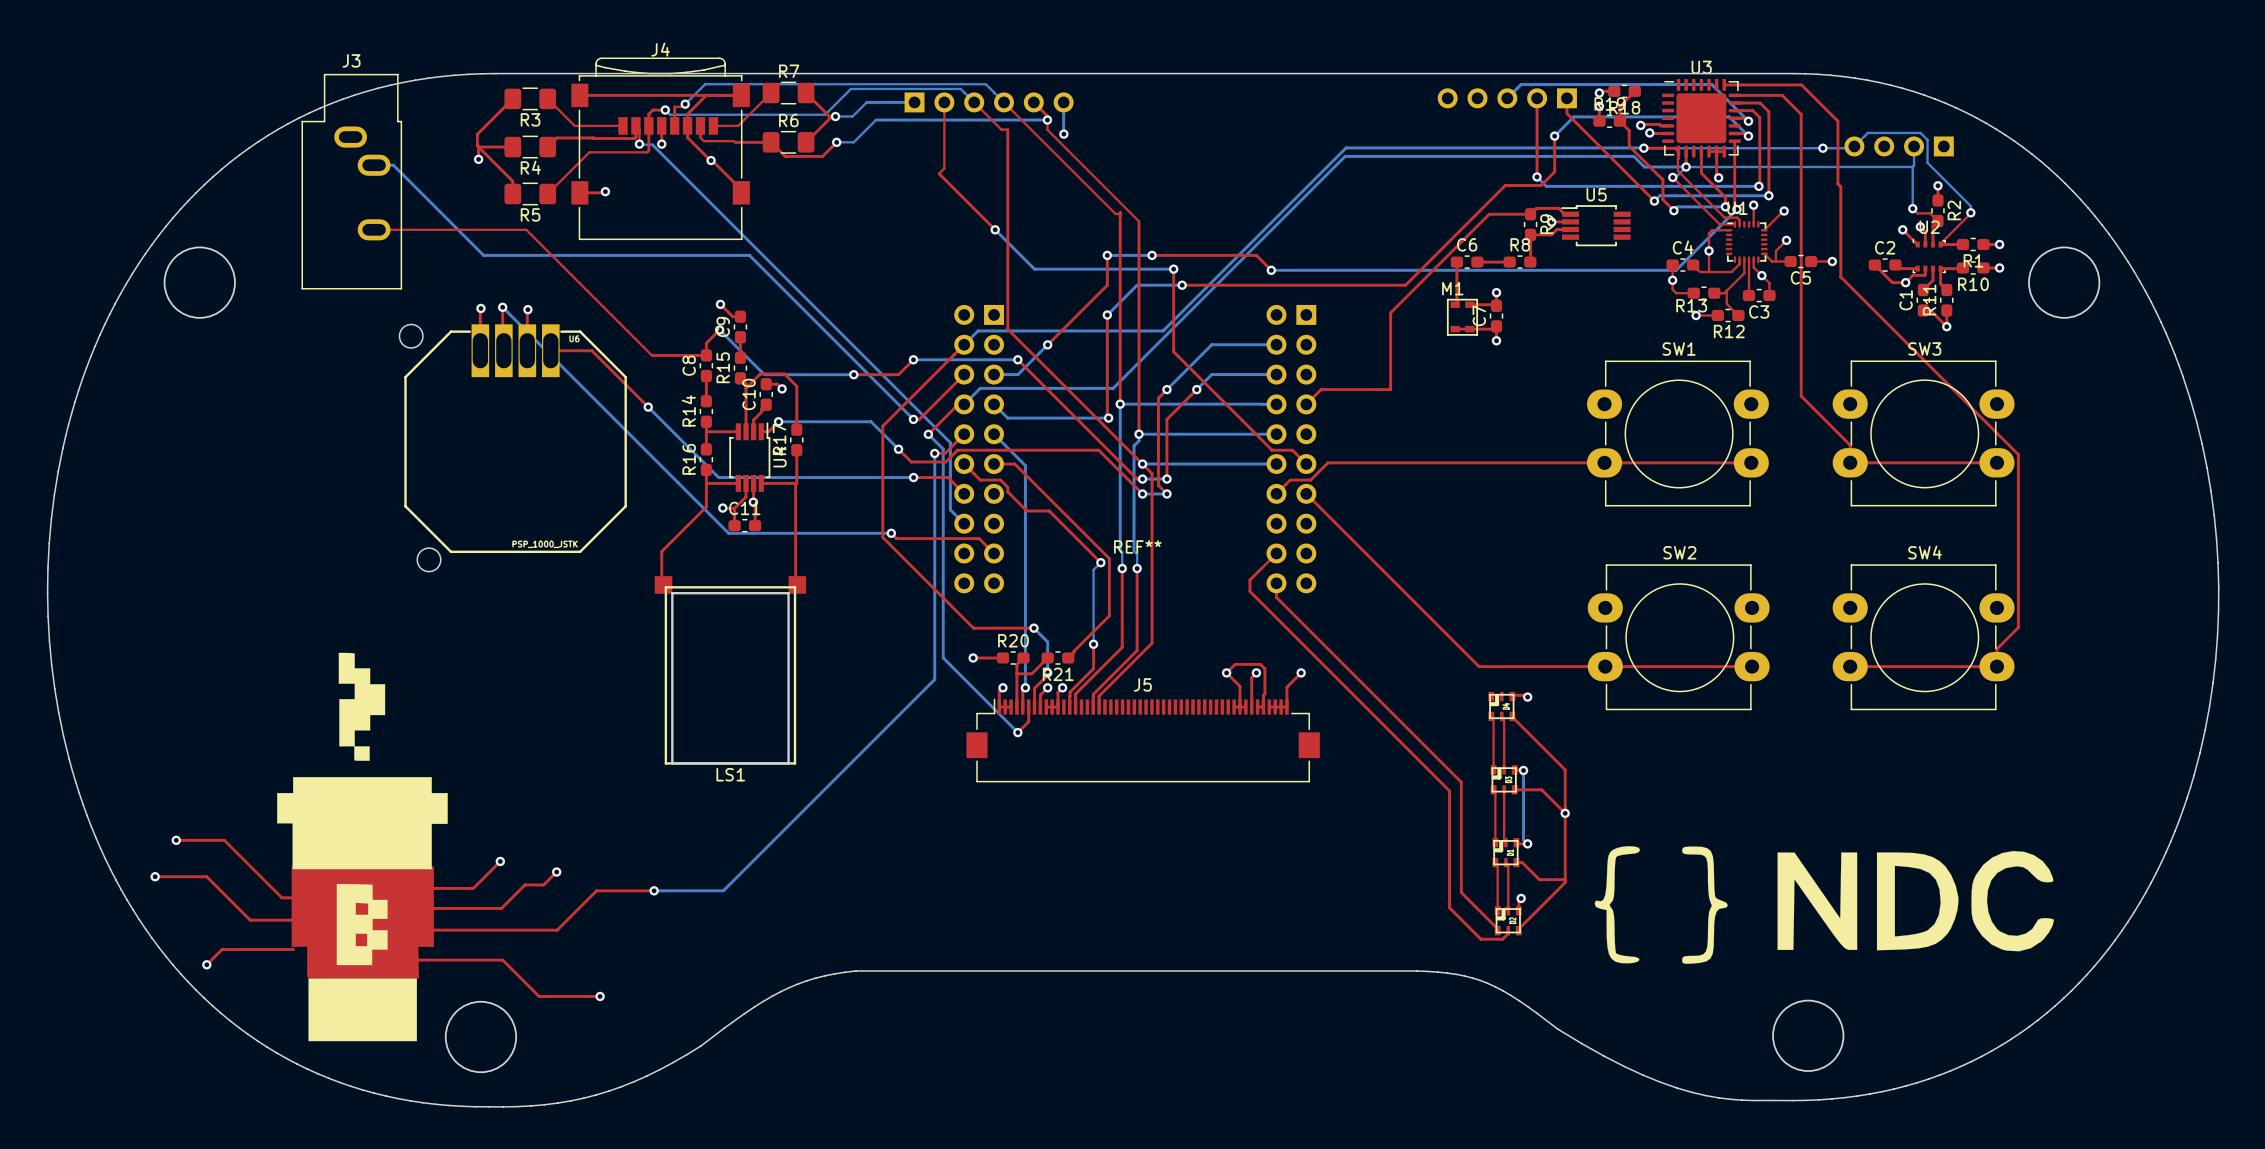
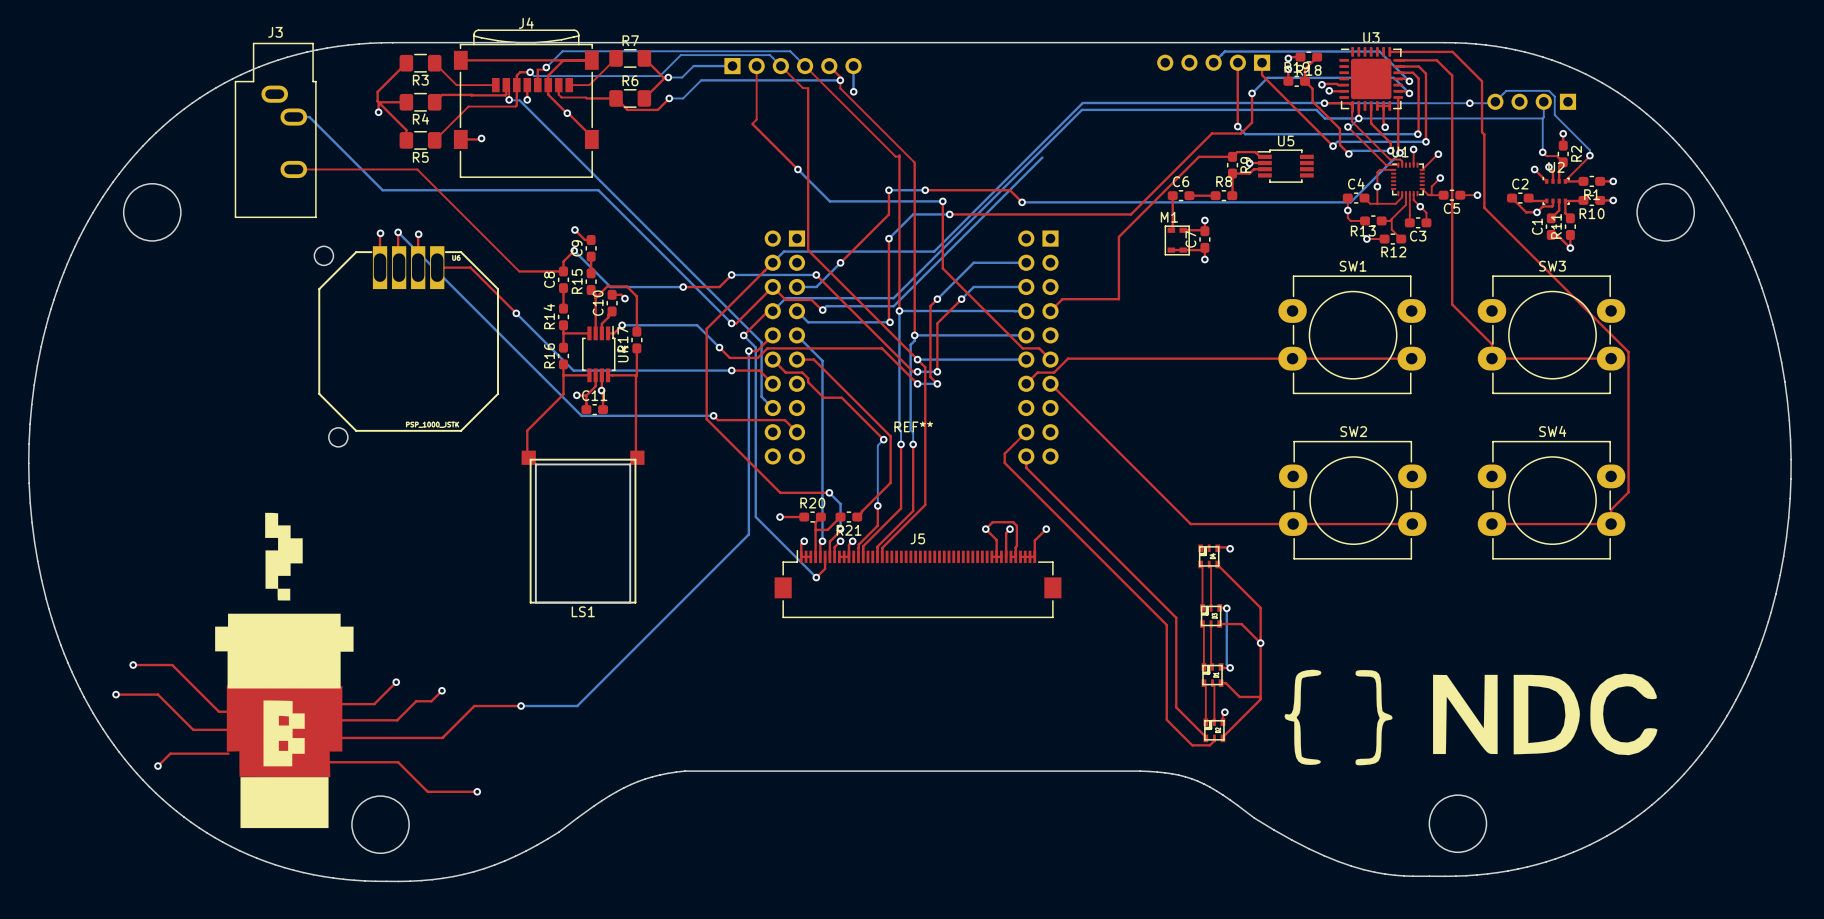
bottom track: none -> (1042, 157) (893, 306) (826, 306) (822, 310)
top track: none -> (772, 286) (785, 299) (811, 299) (822, 310)
via: none -> (822, 310)

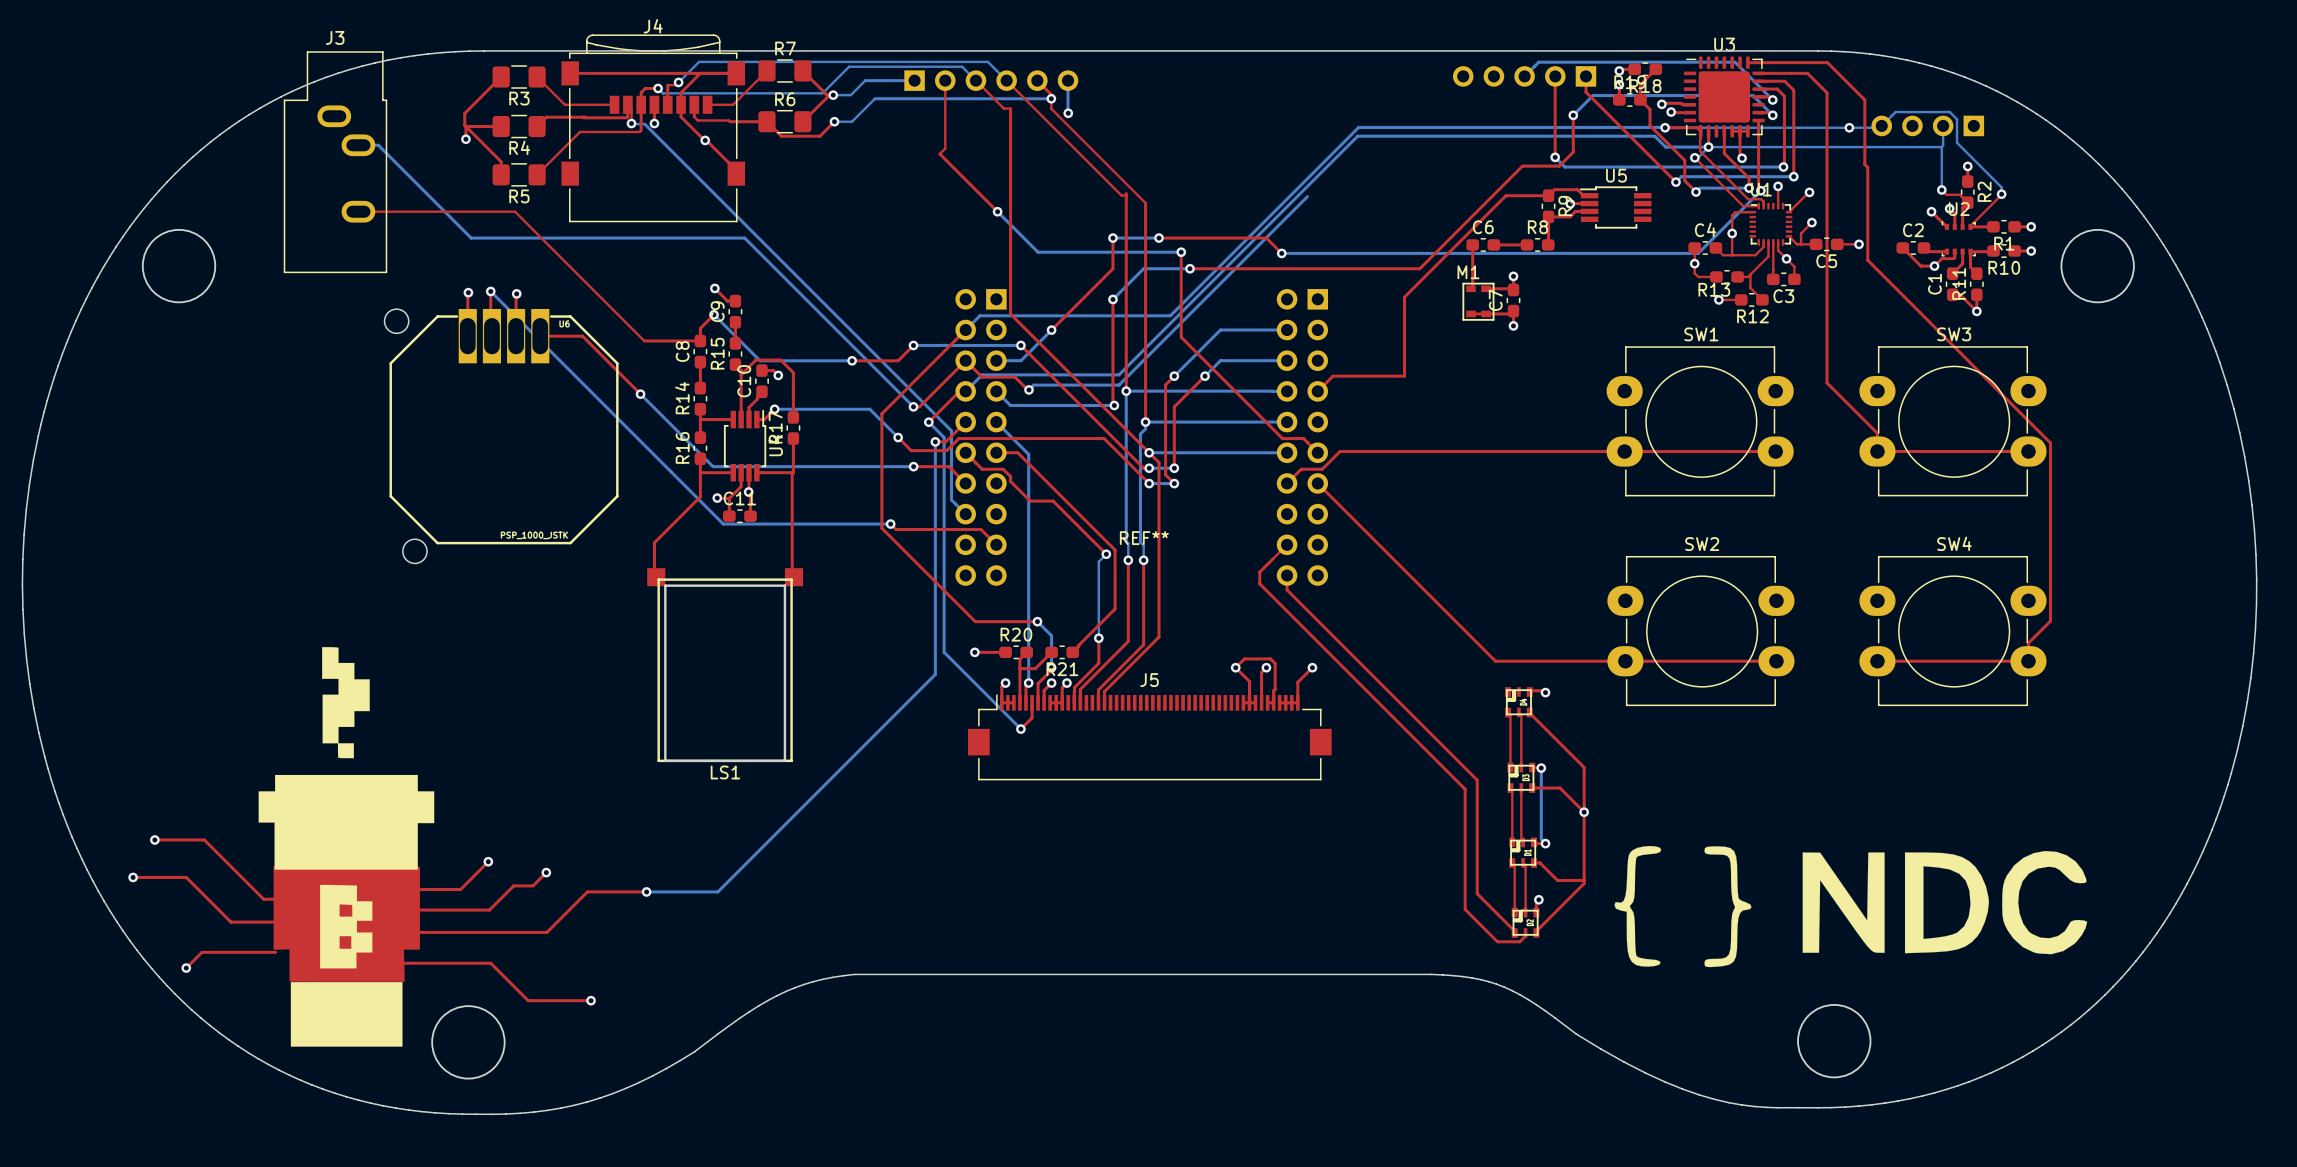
top track: (481, 138) (460, 139) -> none
via: (481, 138) -> none

